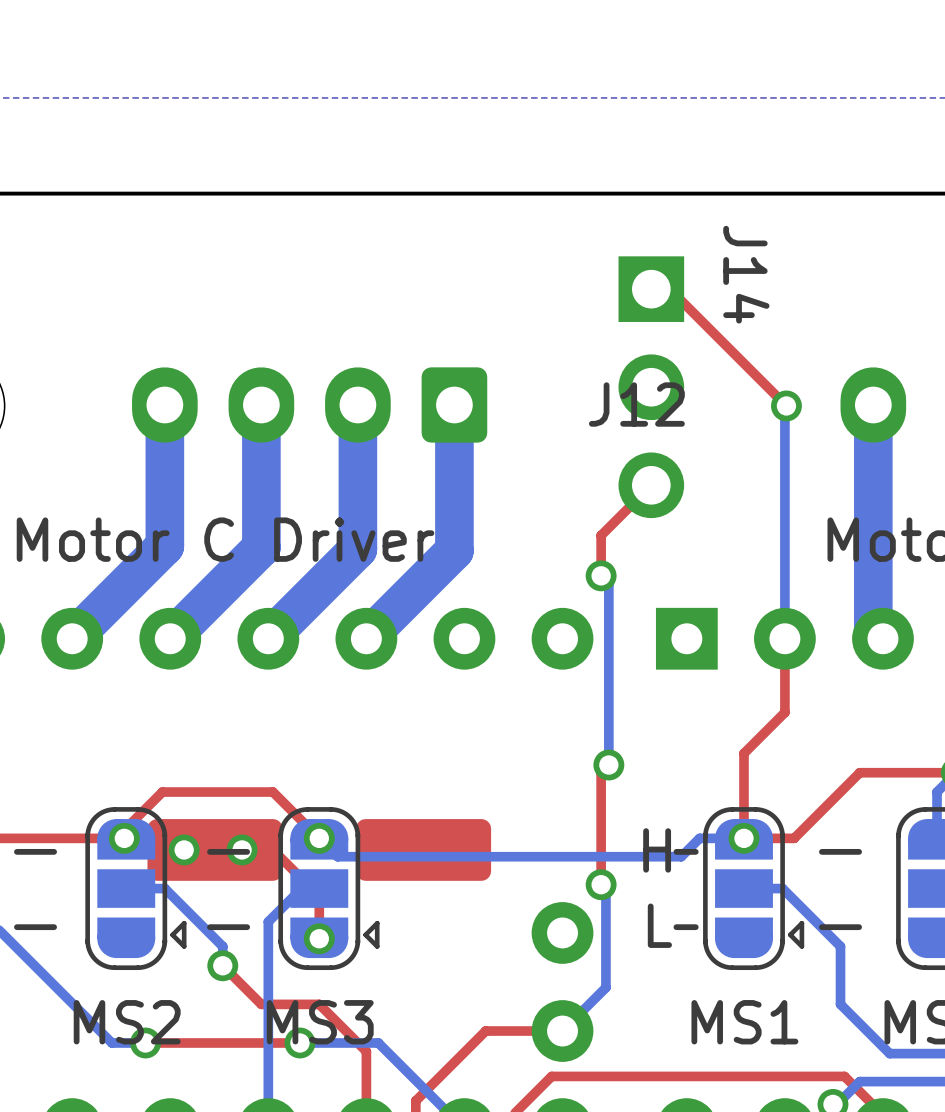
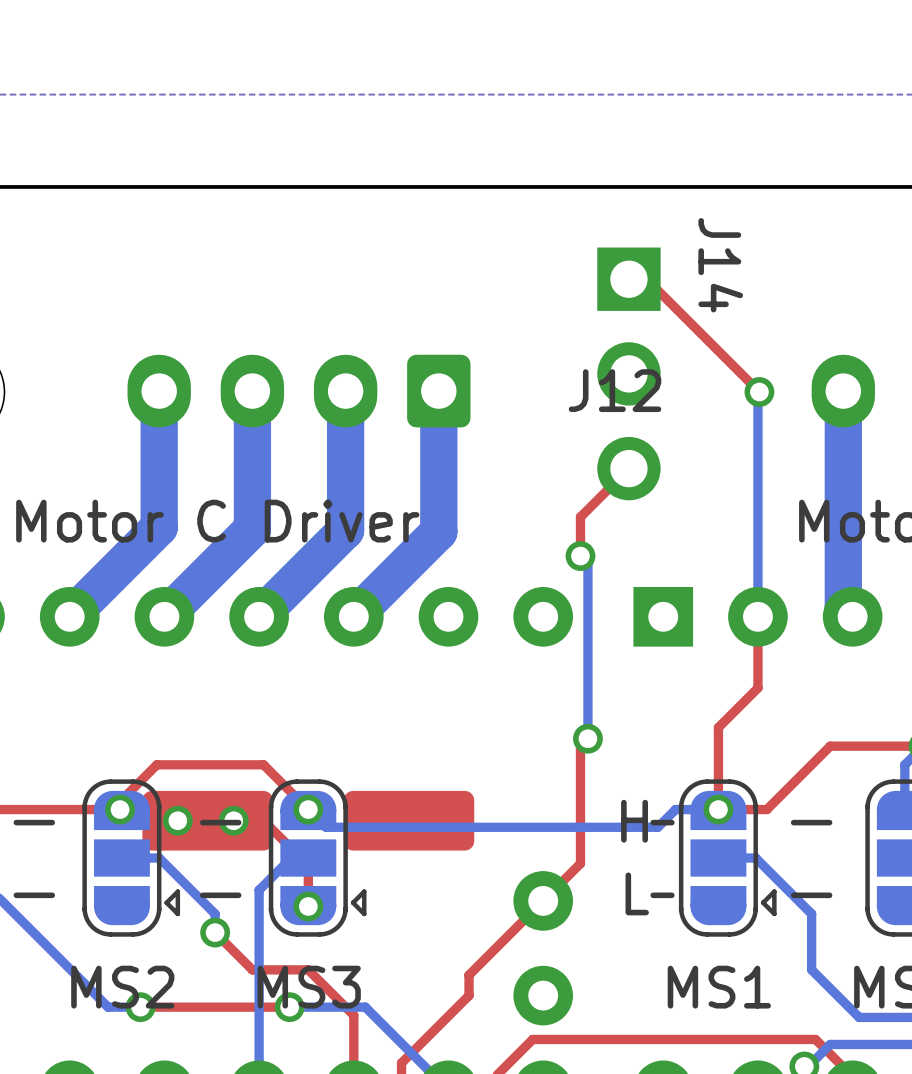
bottom track: (601, 884) (605, 889) (605, 987) (562, 1031) -> none
via: (601, 884) -> none
top track: (562, 1031) (485, 1031) -> (580, 854) (580, 863) (469, 975) (469, 995)

